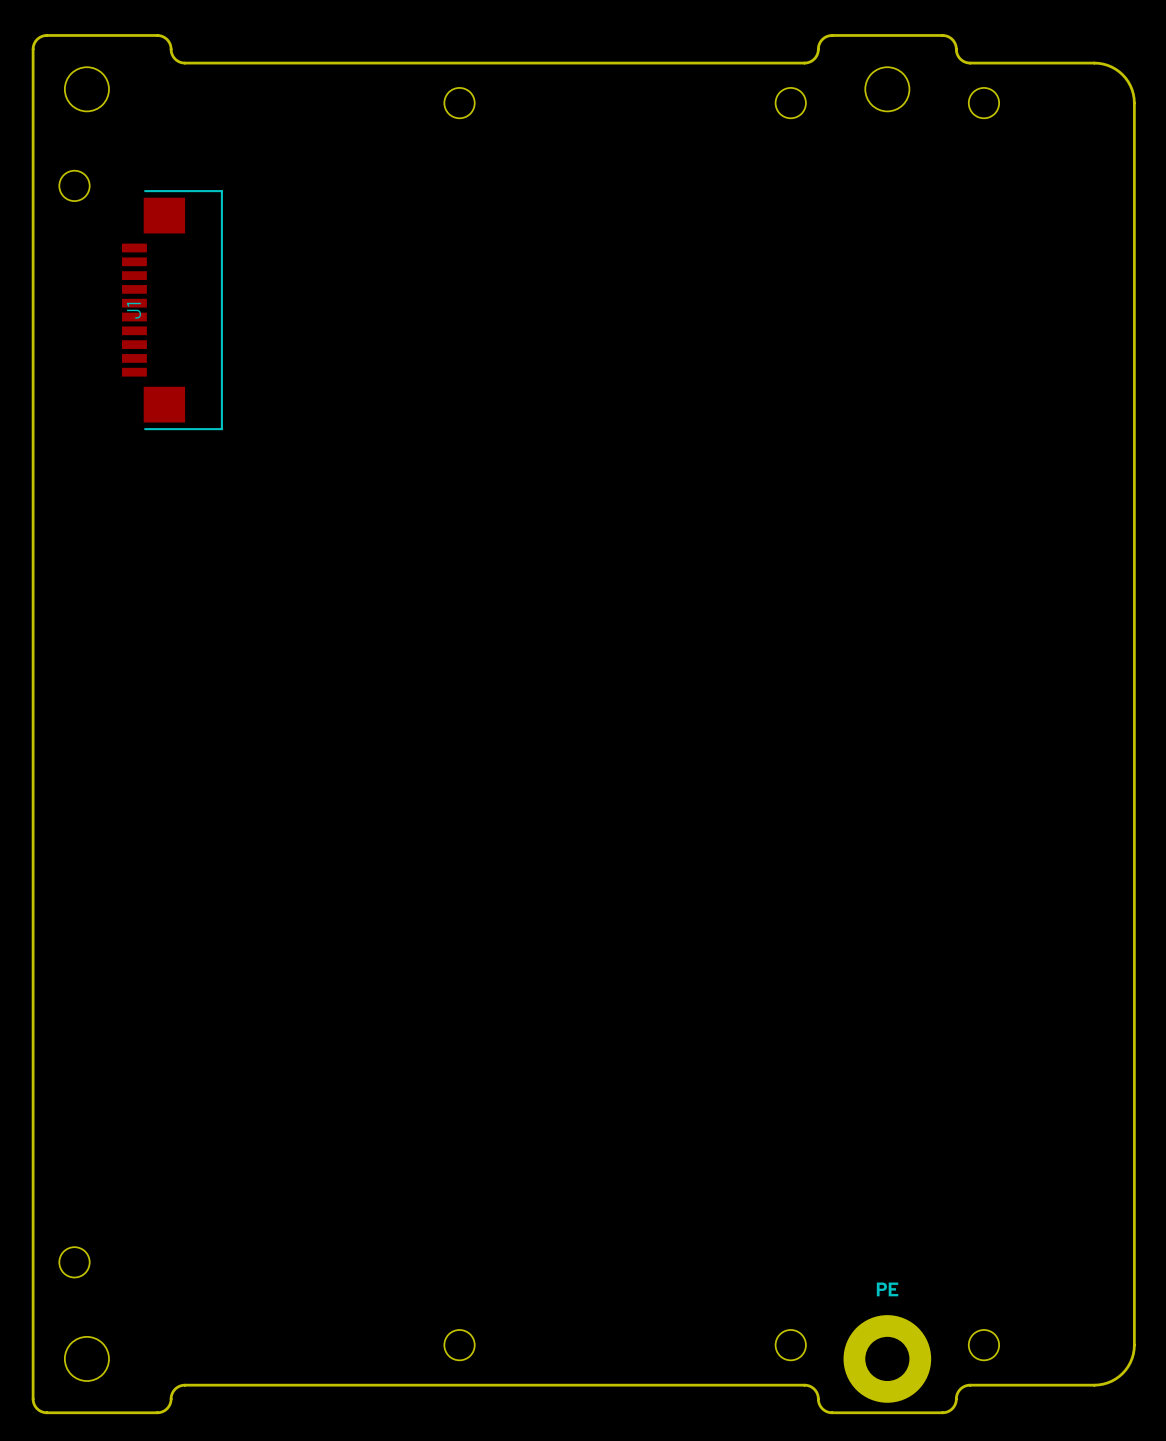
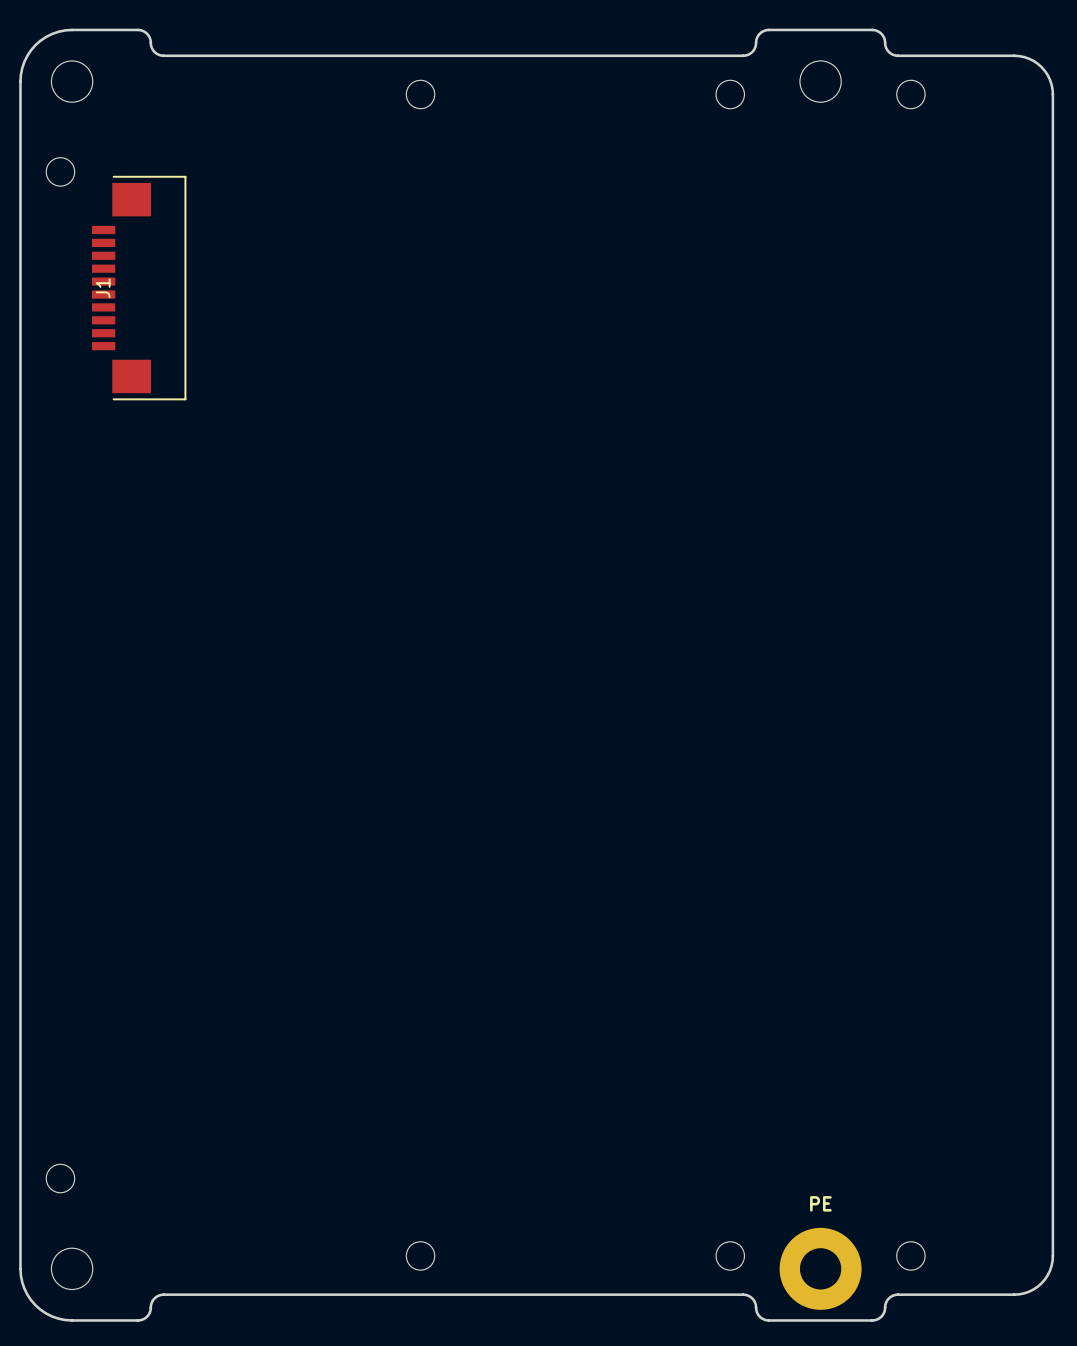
board edge: (46, 35) (160, 35) (168, 41) (175, 59) (184, 63) (804, 63) (814, 59) (820, 41) (829, 35) (942, 35) (952, 39) (958, 56) (967, 62) (1098, 63) (1115, 69) (1125, 78) (1132, 89) (1134, 103) (1134, 1345) (1130, 1362) (1119, 1376) (1111, 1381) (1098, 1384) (967, 1385) (958, 1391) (952, 1408) (942, 1412) (829, 1412) (820, 1406) (814, 1389) (804, 1385) (184, 1385) (175, 1389) (168, 1406) (158, 1412) (46, 1412) (36, 1407) (33, 1398) (33, 49) (37, 39) (46, 35) -> (72, 29) (52, 33) (35, 45) (24, 61) (20, 81) (20, 1268) (22, 1282) (31, 1300) (46, 1313) (65, 1320) (137, 1320) (147, 1316) (153, 1299) (163, 1294) (743, 1294) (752, 1298) (758, 1314) (766, 1320) (872, 1320) (881, 1316) (887, 1300) (895, 1294) (1014, 1294) (1024, 1293) (1037, 1286) (1047, 1275) (1052, 1255) (1052, 94) (1049, 79) (1044, 70) (1033, 60) (1019, 56) (895, 55) (887, 49) (881, 33) (872, 29) (766, 30) (758, 36) (752, 51) (743, 55) (163, 55) (154, 51) (148, 36) (140, 30) (72, 29)
J1 position: (172, 310) -> (139, 288)

